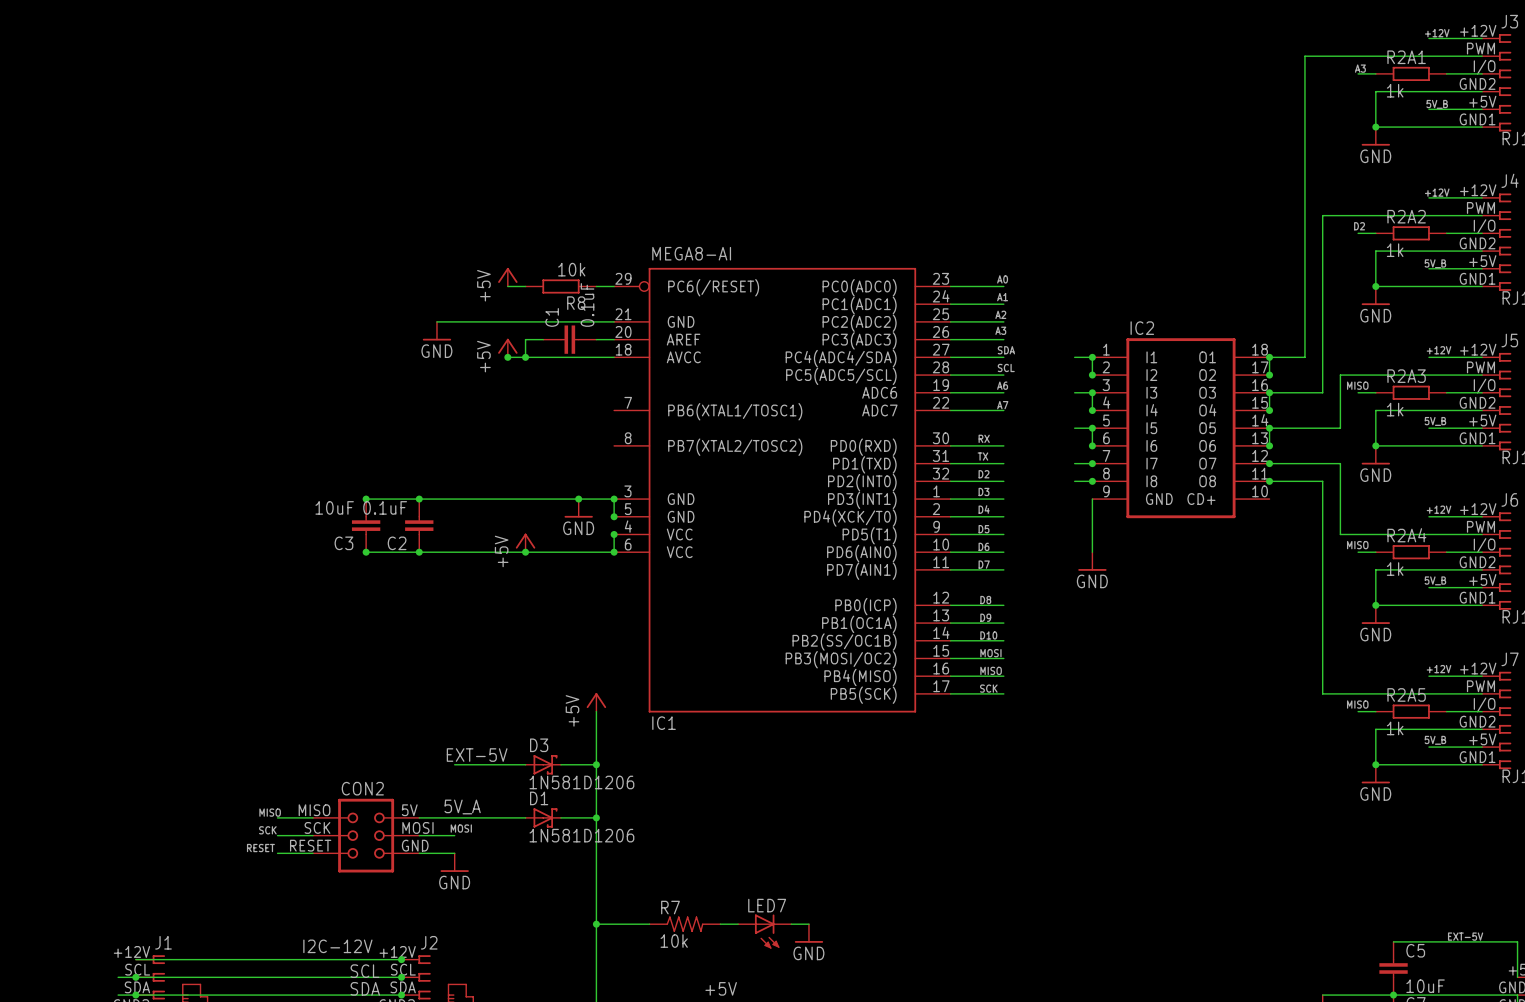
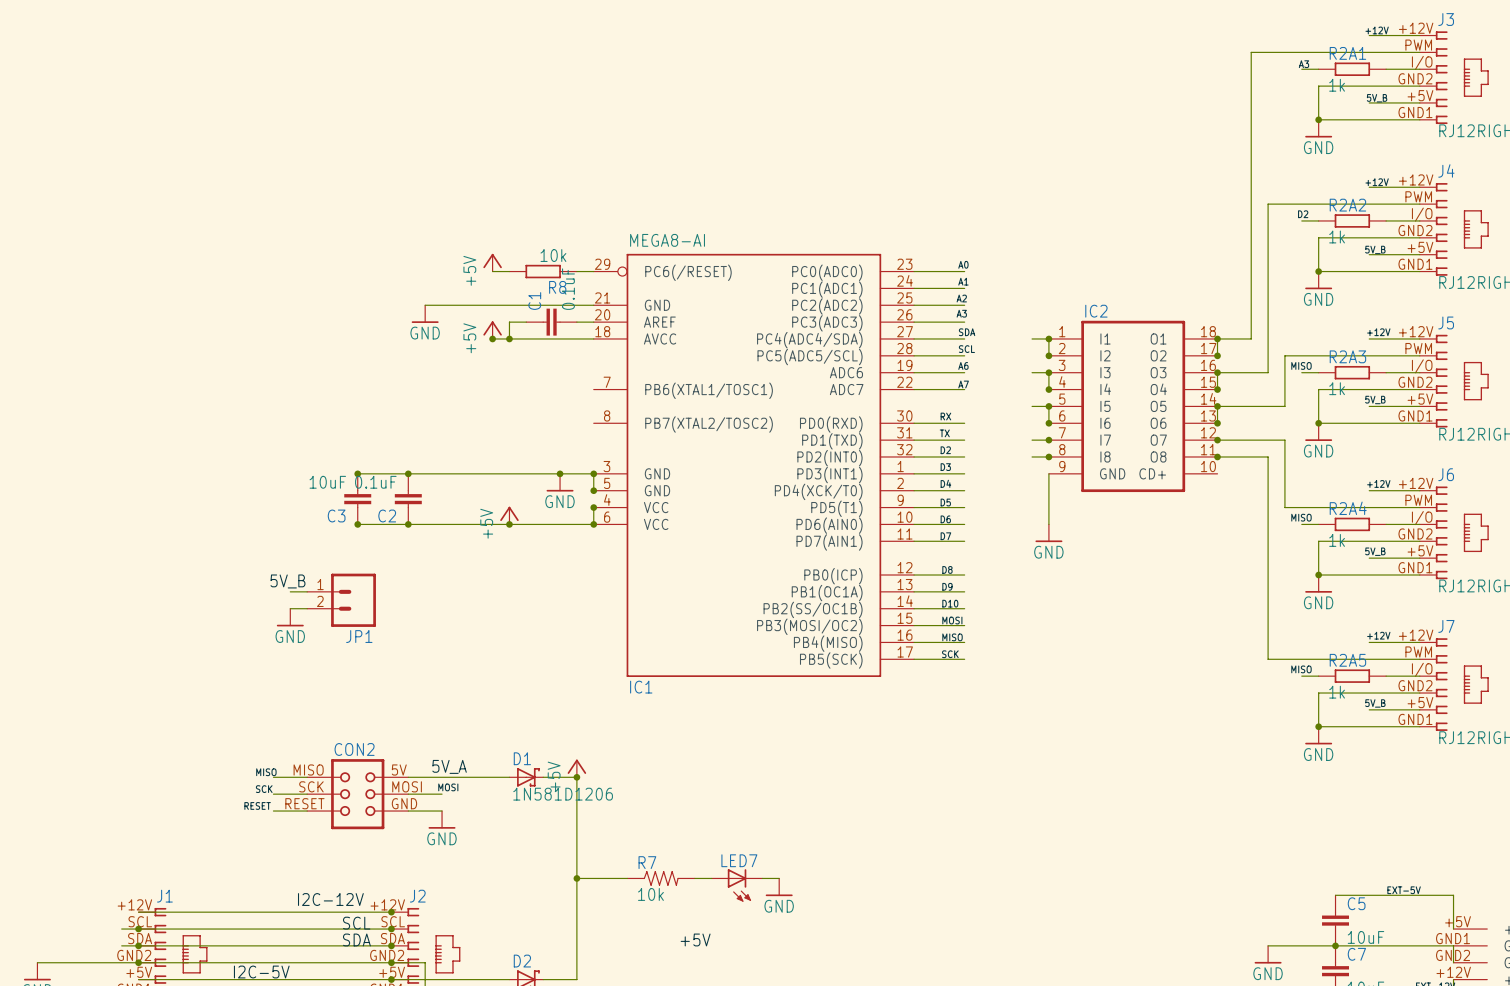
label: none -> 5V_B (287, 581)
wire: none -> (290, 591) (307, 591)
JP1: none -> (341, 600)
wire: none -> (290, 608) (307, 608)
power symbol: none -> GND (290, 617)
power symbol position: +5V (596, 702) -> +5V (576, 768)
wire: (596, 711) (596, 817) -> none
label: EXT-5V (477, 755) -> none
wire: (454, 764) (525, 764) -> none
D3: 1N581D1206 (543, 764) -> none
wire: (560, 764) (596, 764) -> none
junction: (596, 764) -> none

